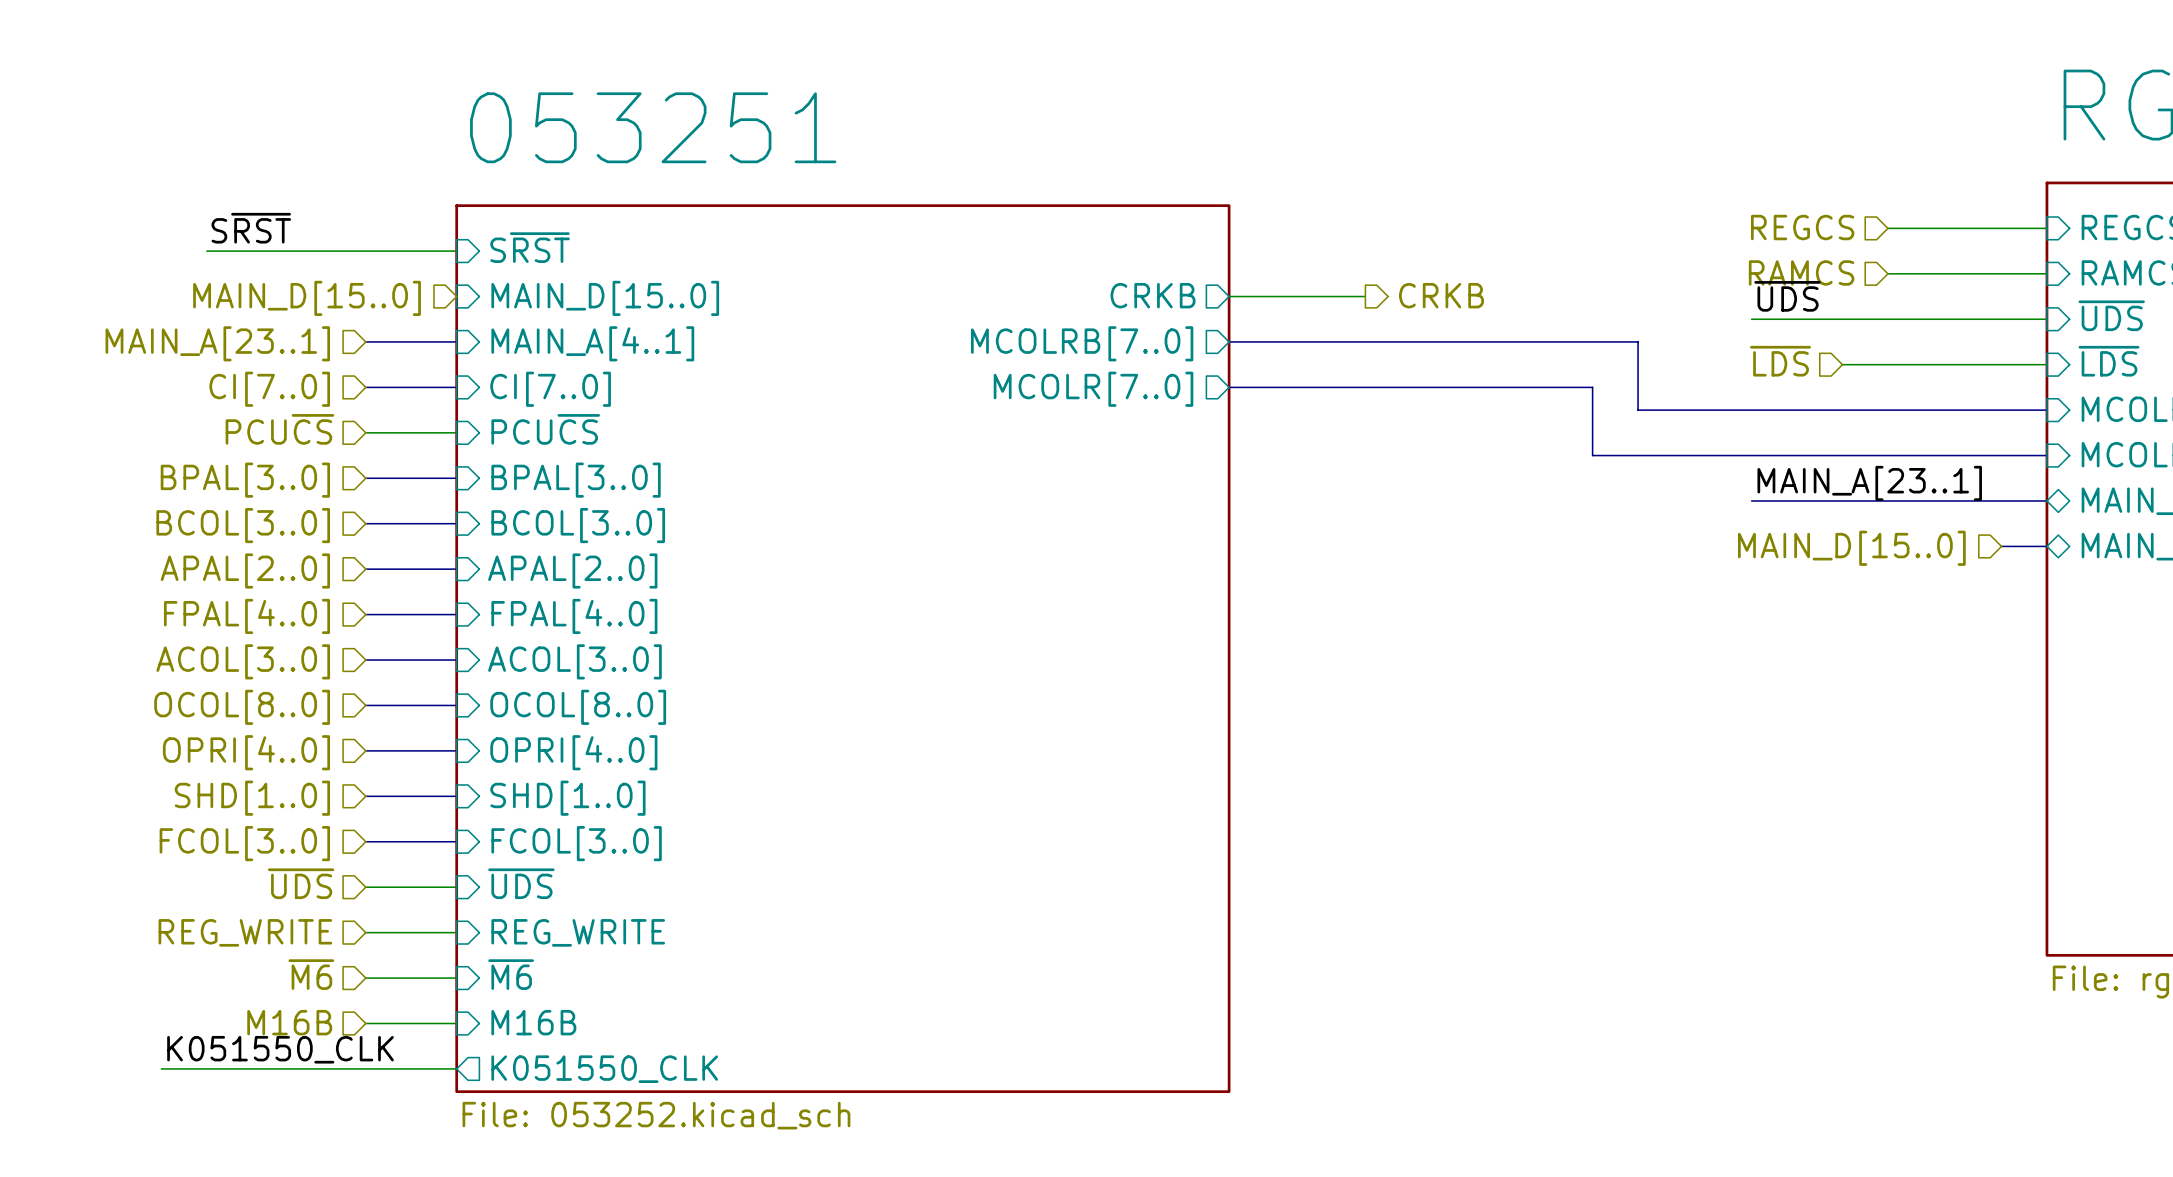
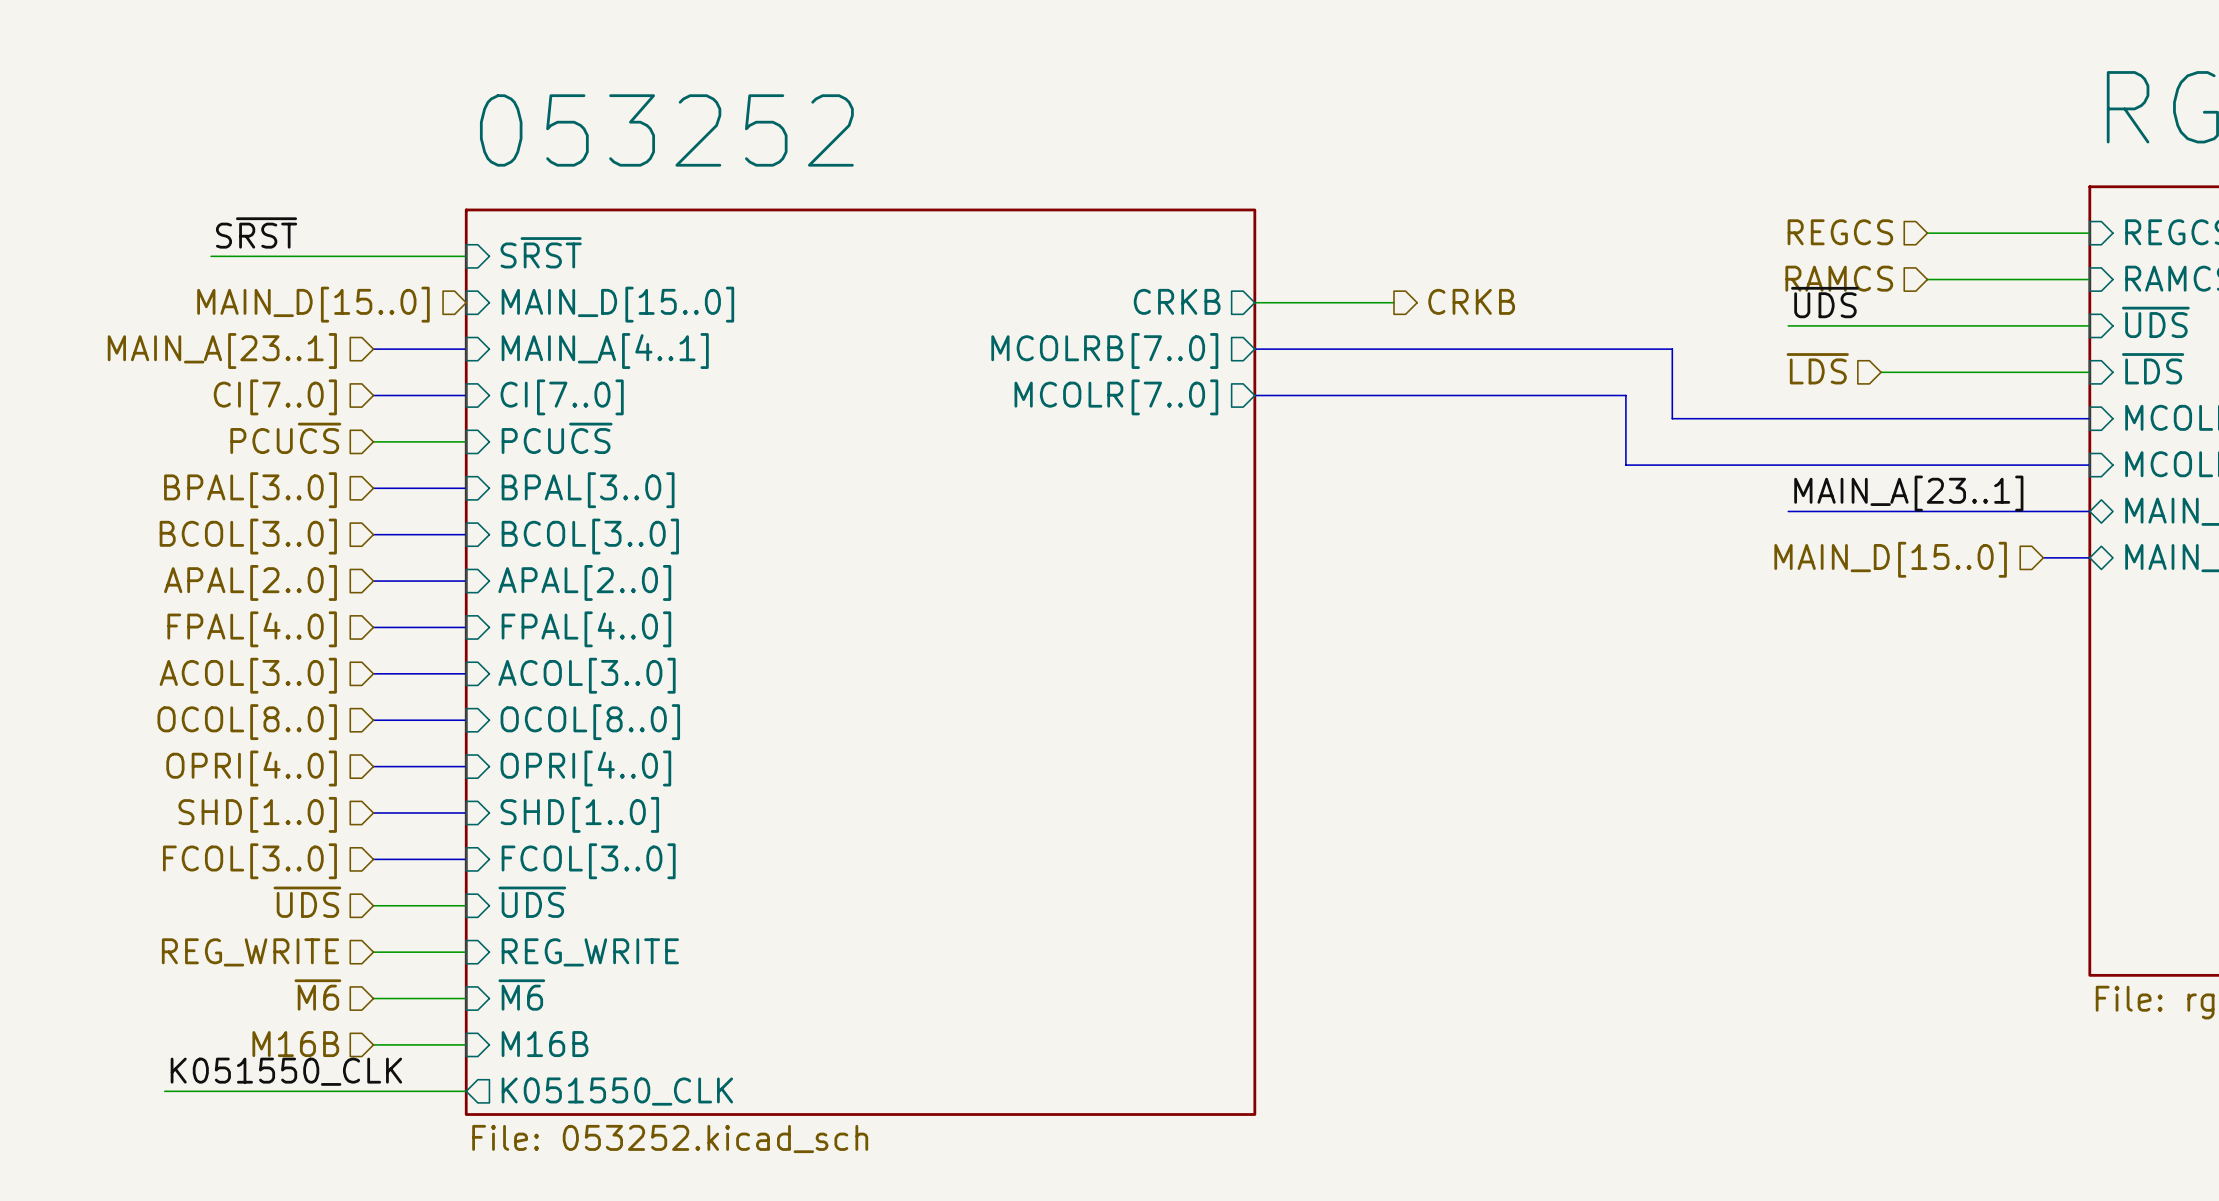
sheet 053251 name: 053251 (653, 127) -> 053252 (666, 130)

